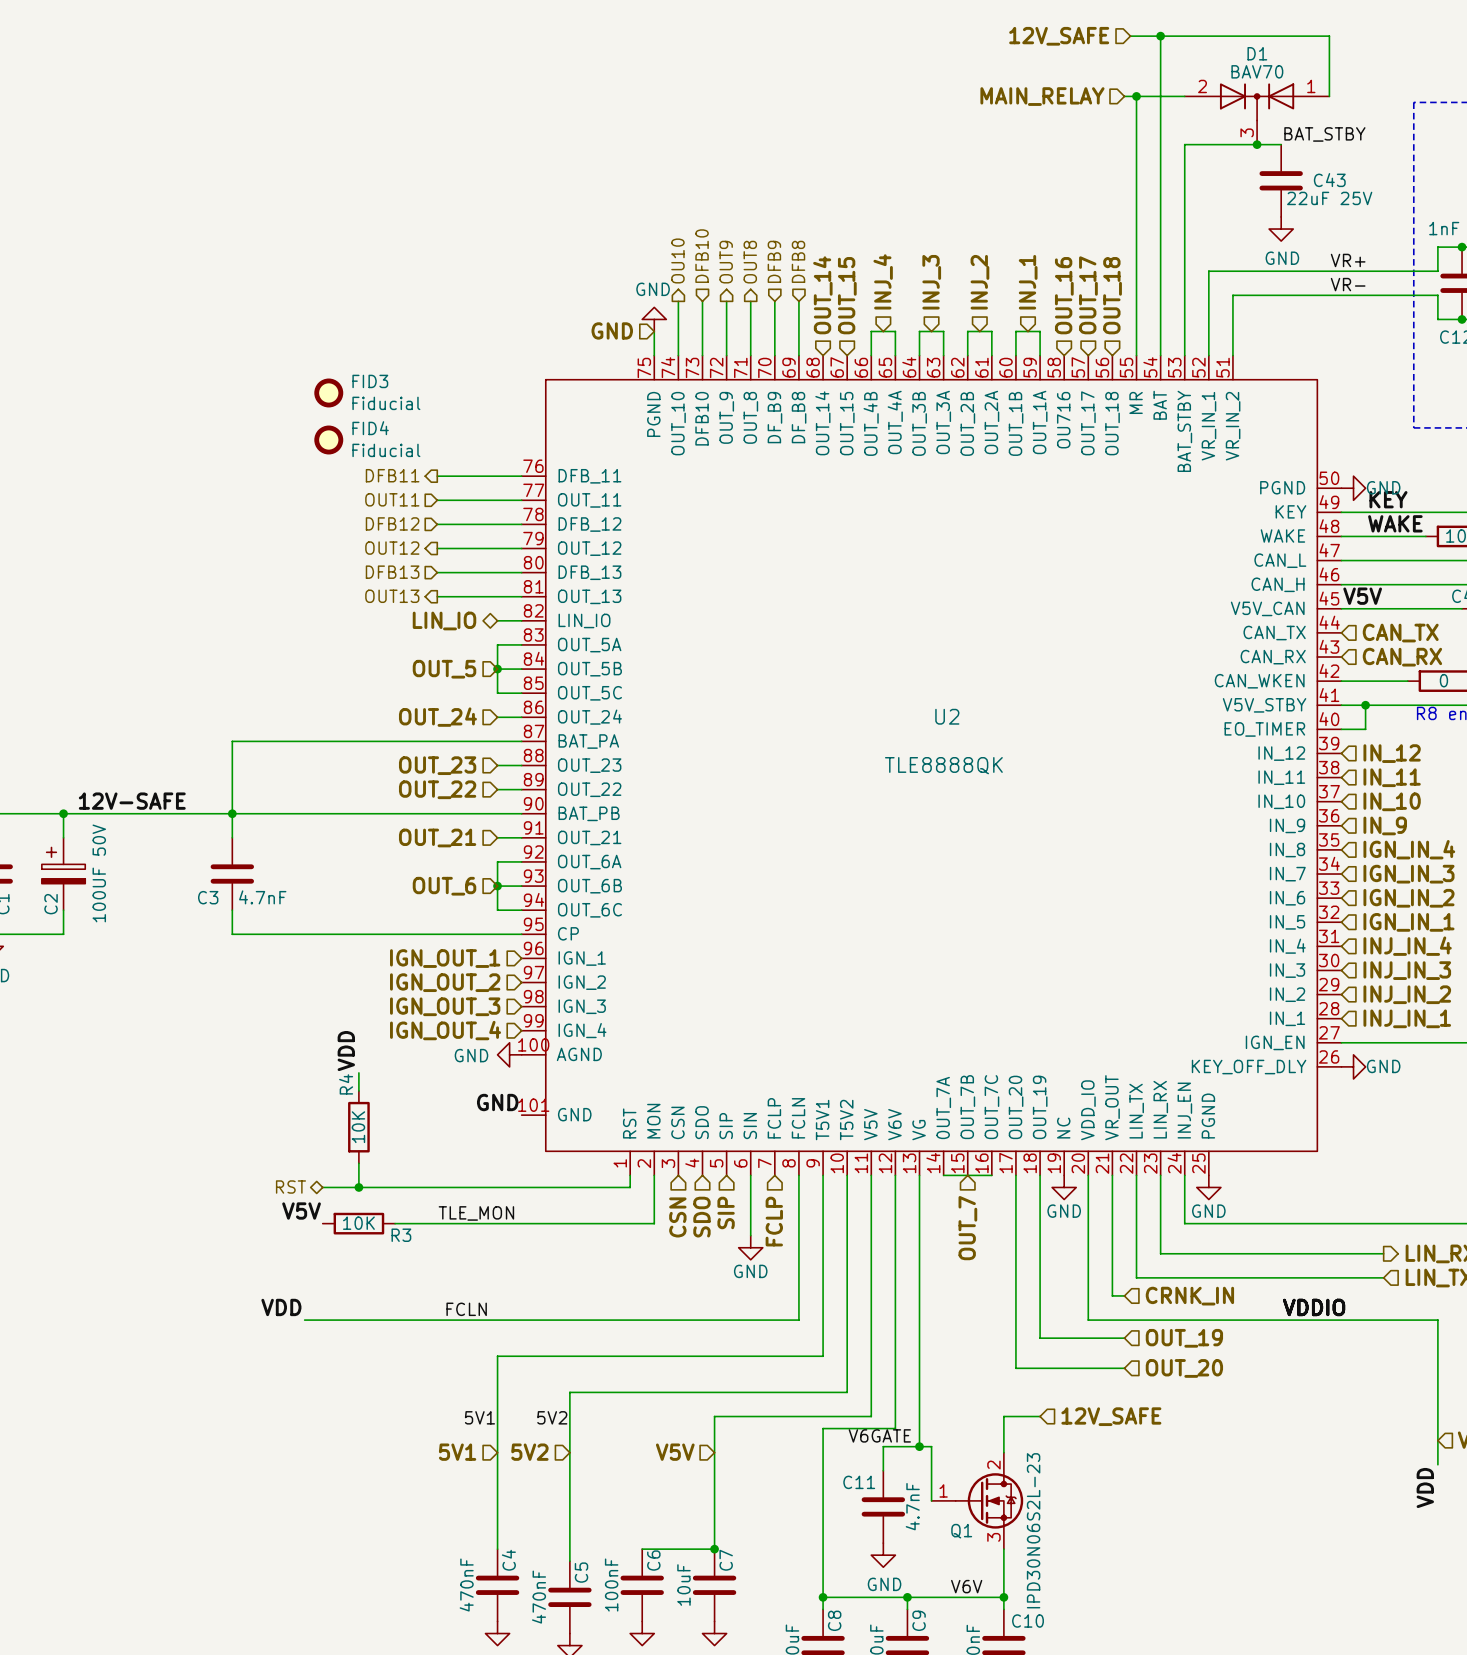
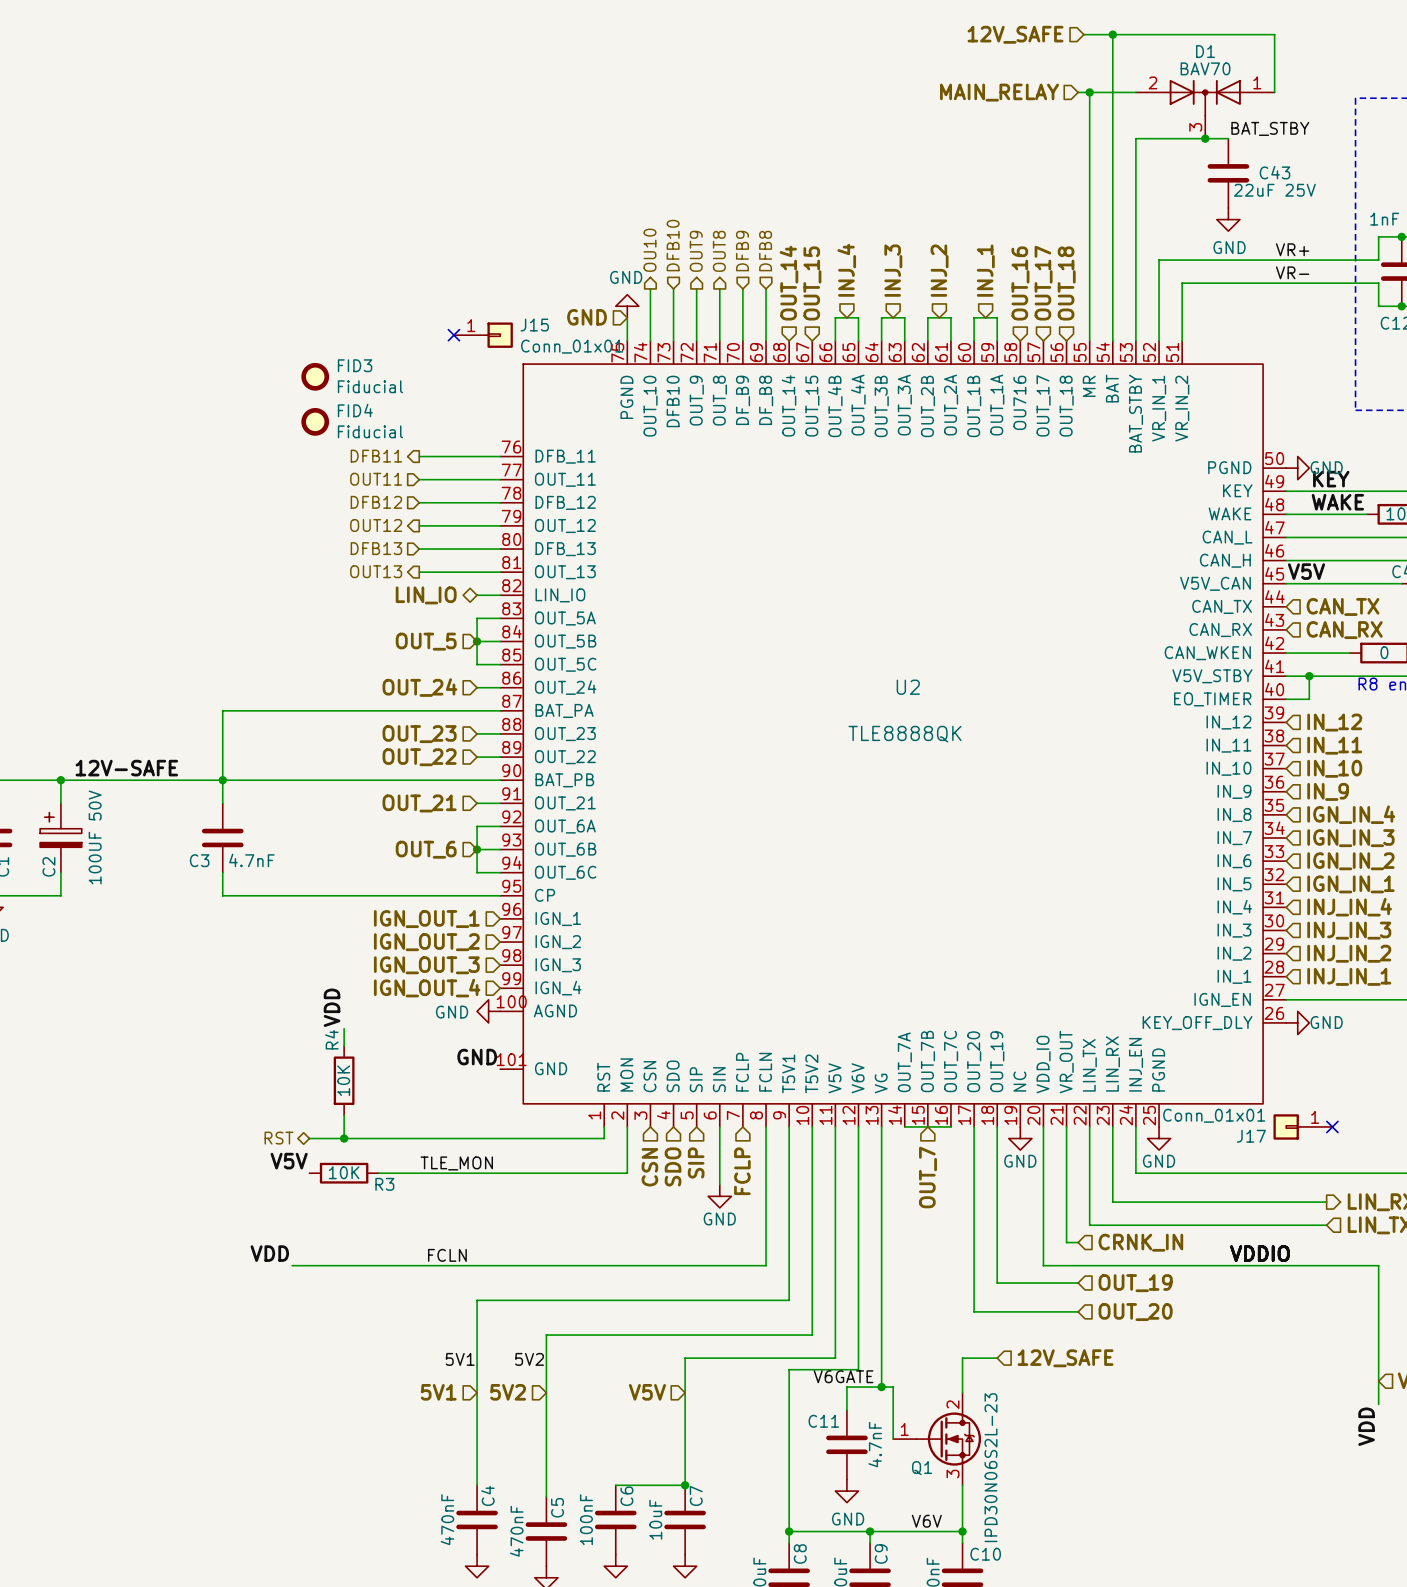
no-connect mark: none -> (453, 335)
J15: none -> Conn_01x01 (483, 335)
J17: none -> Conn_01x01 (1302, 1126)
no-connect mark: none -> (1332, 1126)

